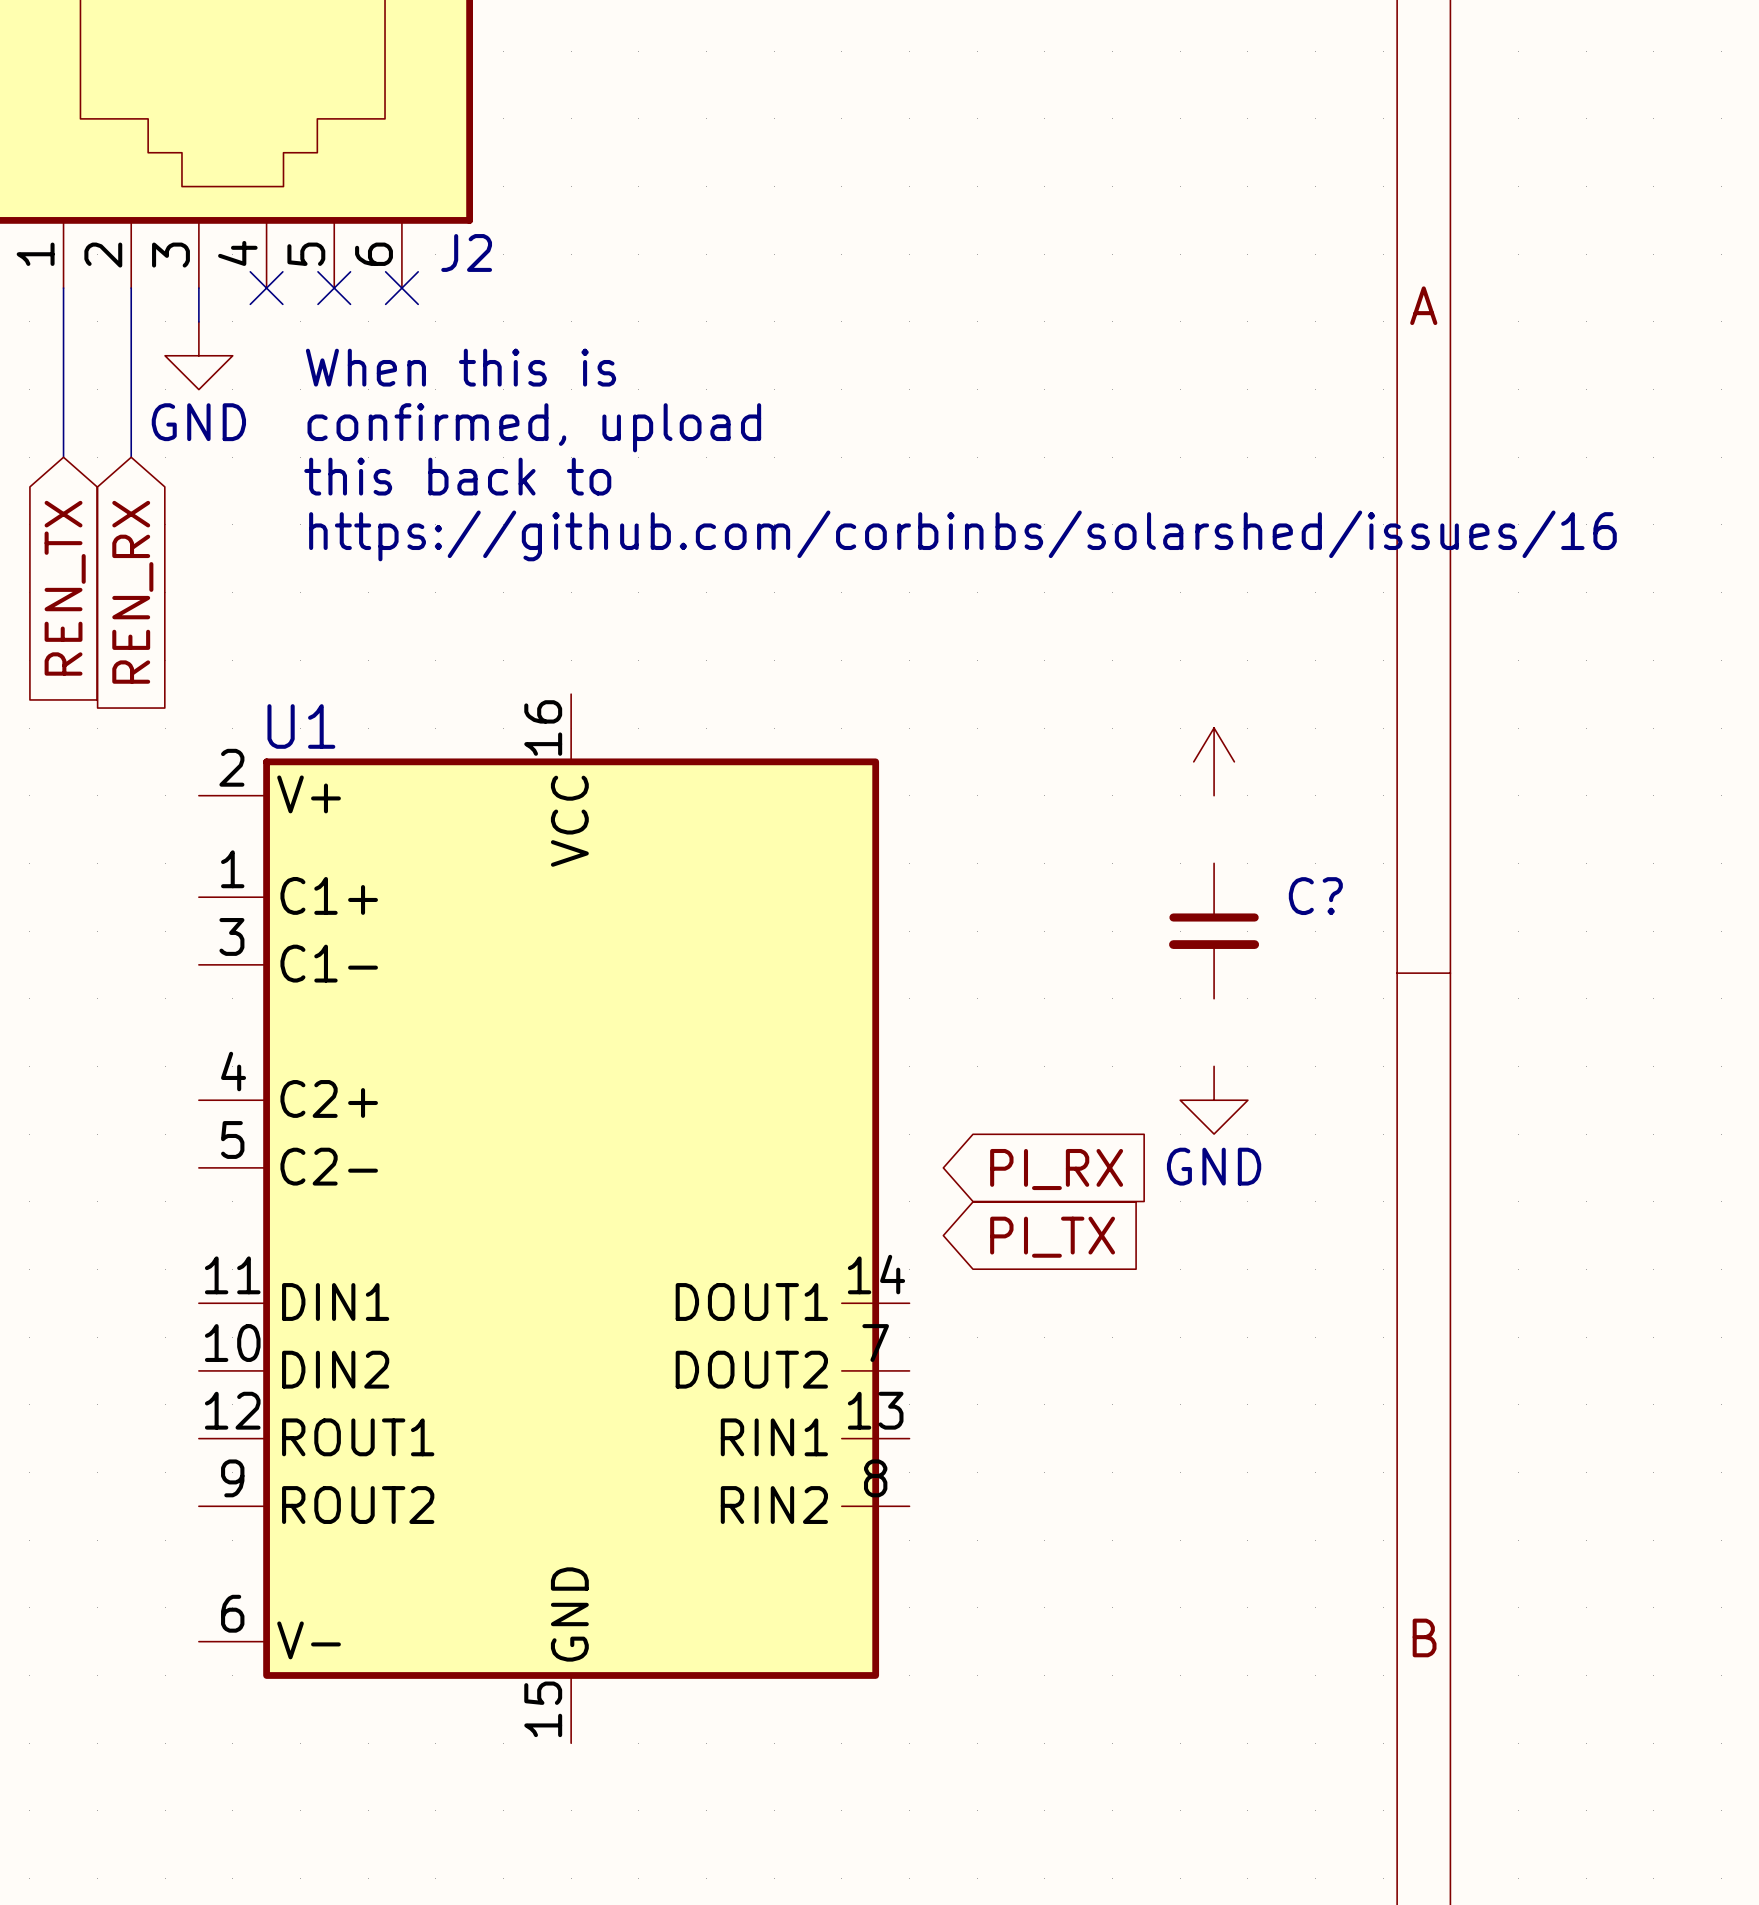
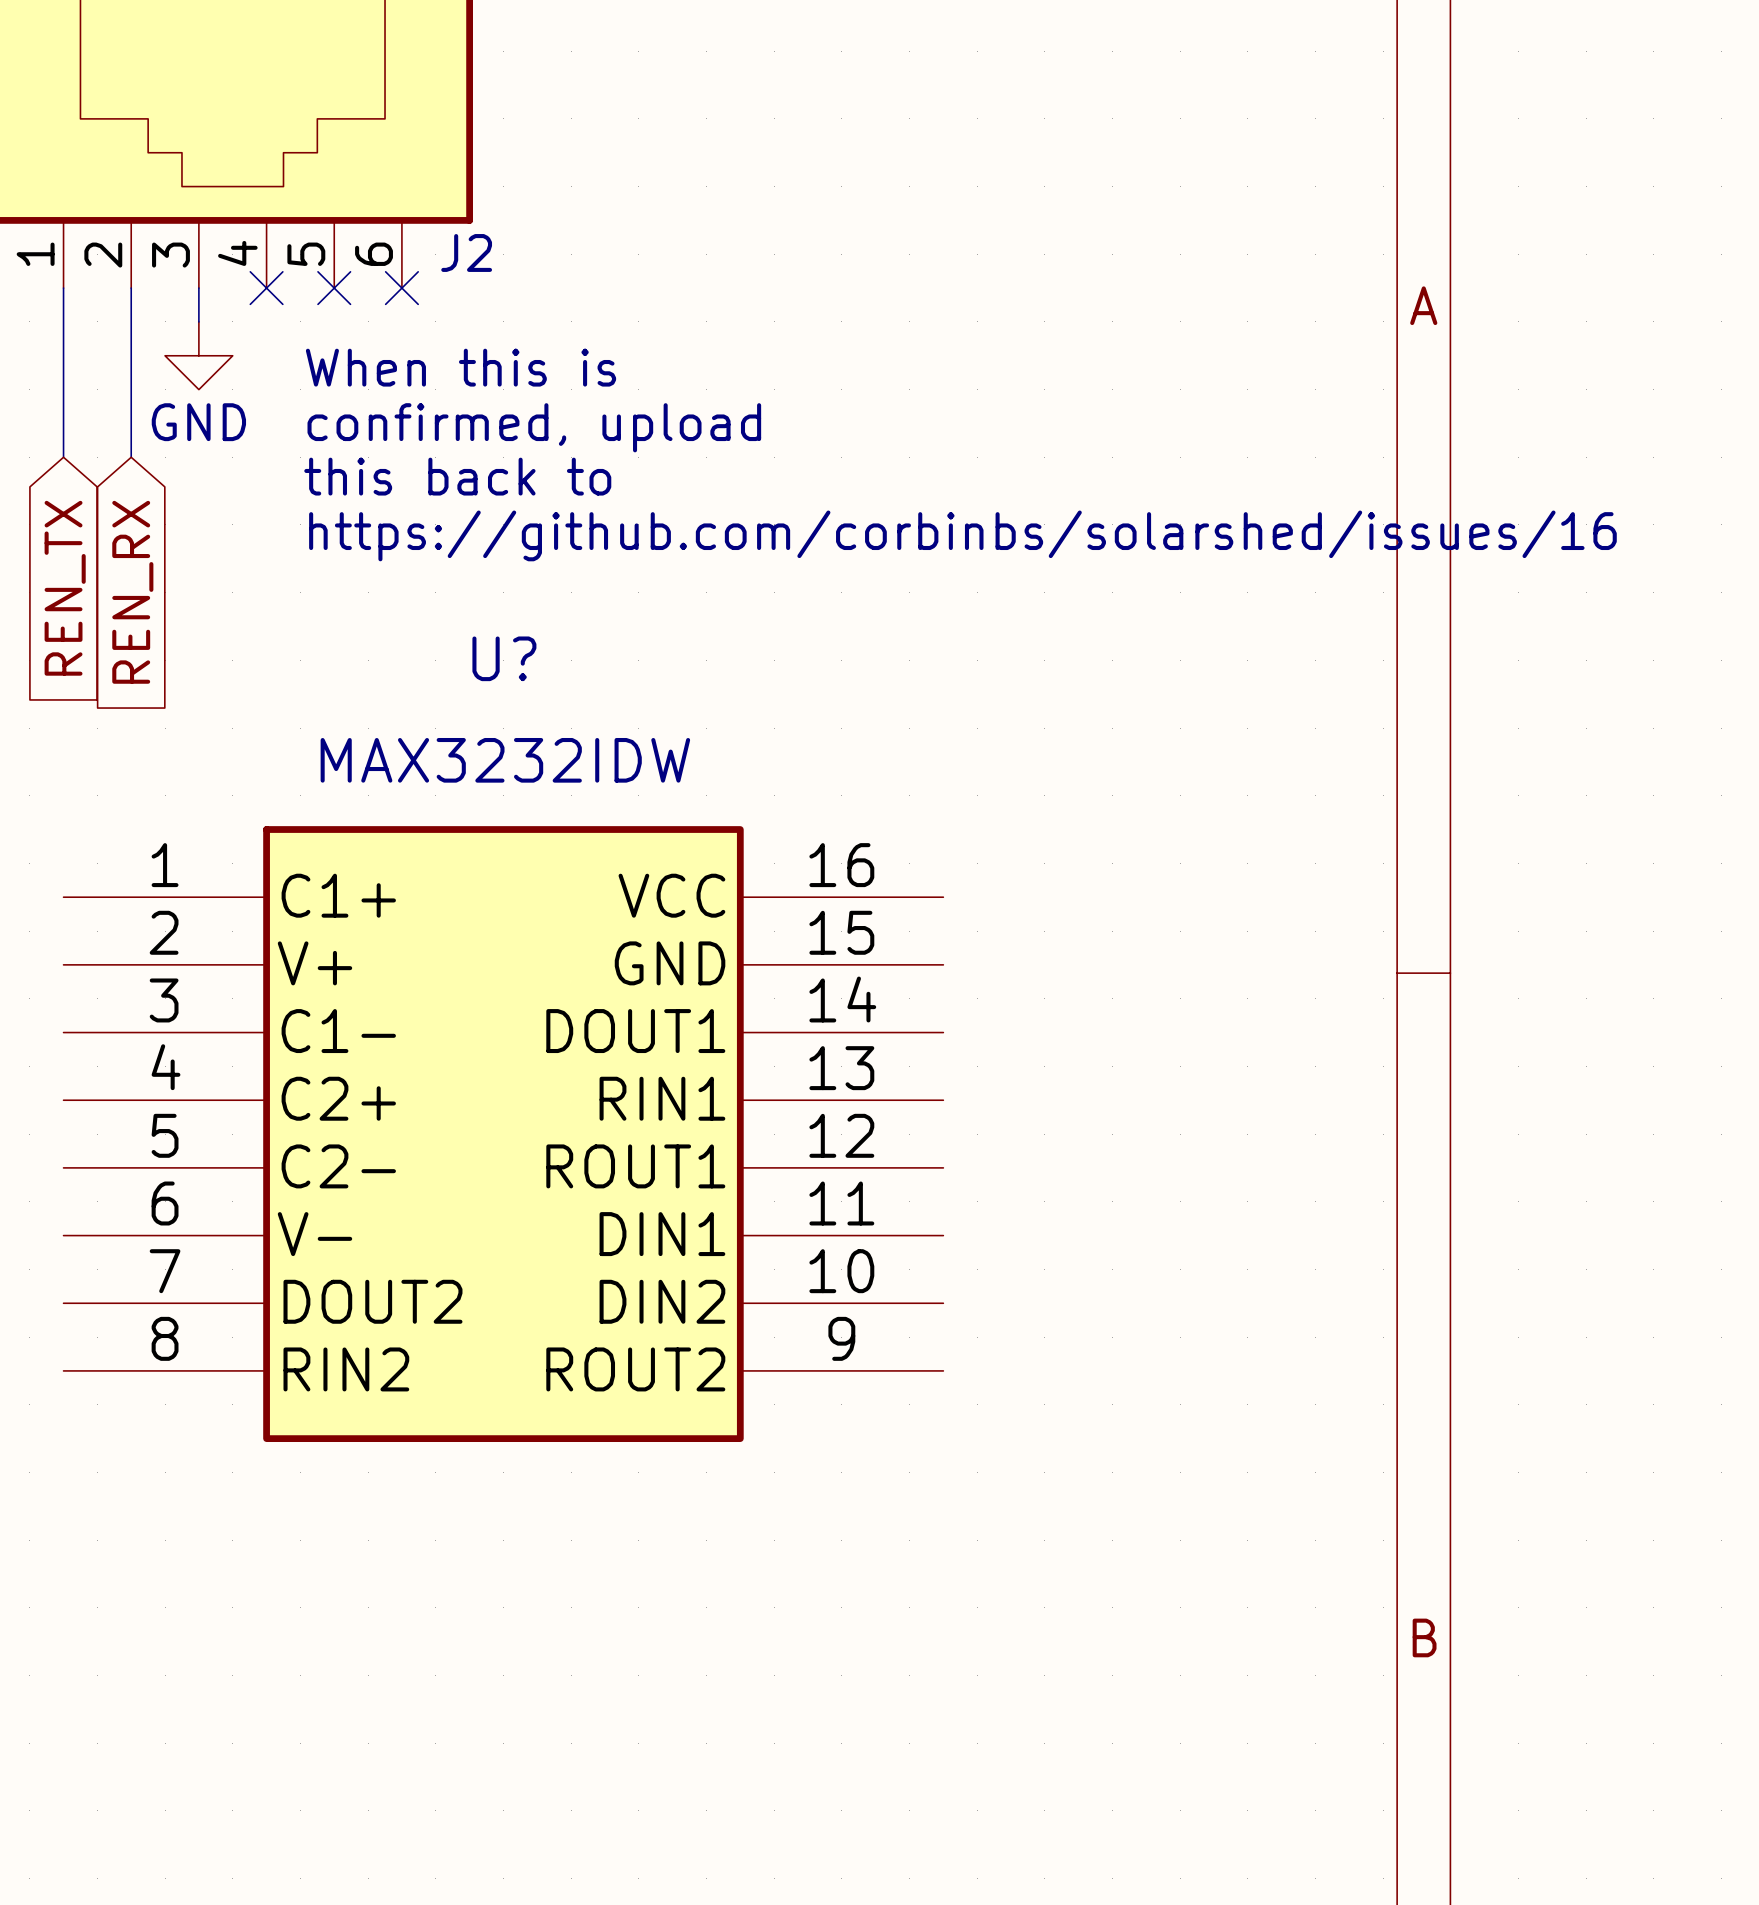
power symbol: (1214, 761) -> none
C?: (1214, 931) -> none
power symbol: GND (1214, 1100) -> none
U?: none -> MAX3232IDW (503, 1134)
global label: PI_RX (1056, 1169) -> none
U1: (554, 1218) -> none
global label: PI_TX (1052, 1237) -> none

